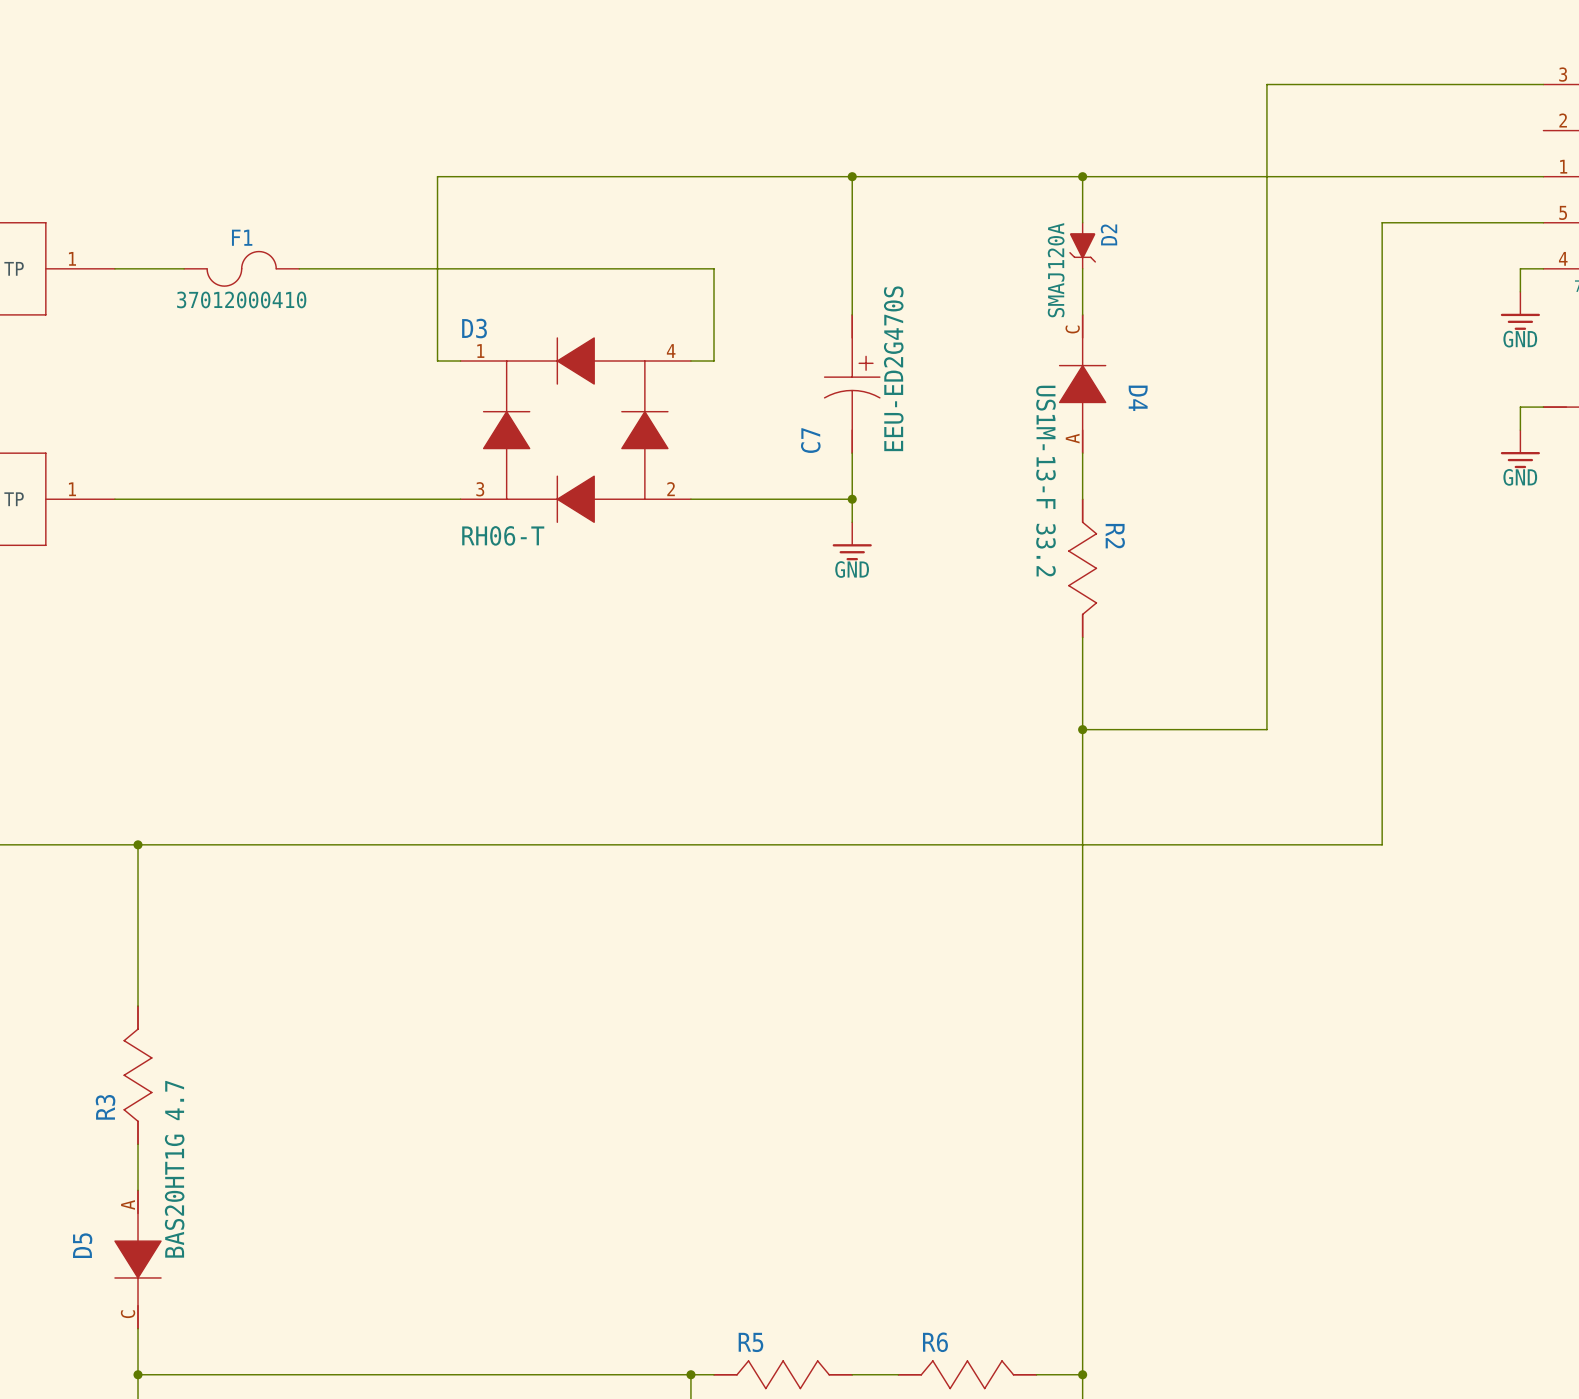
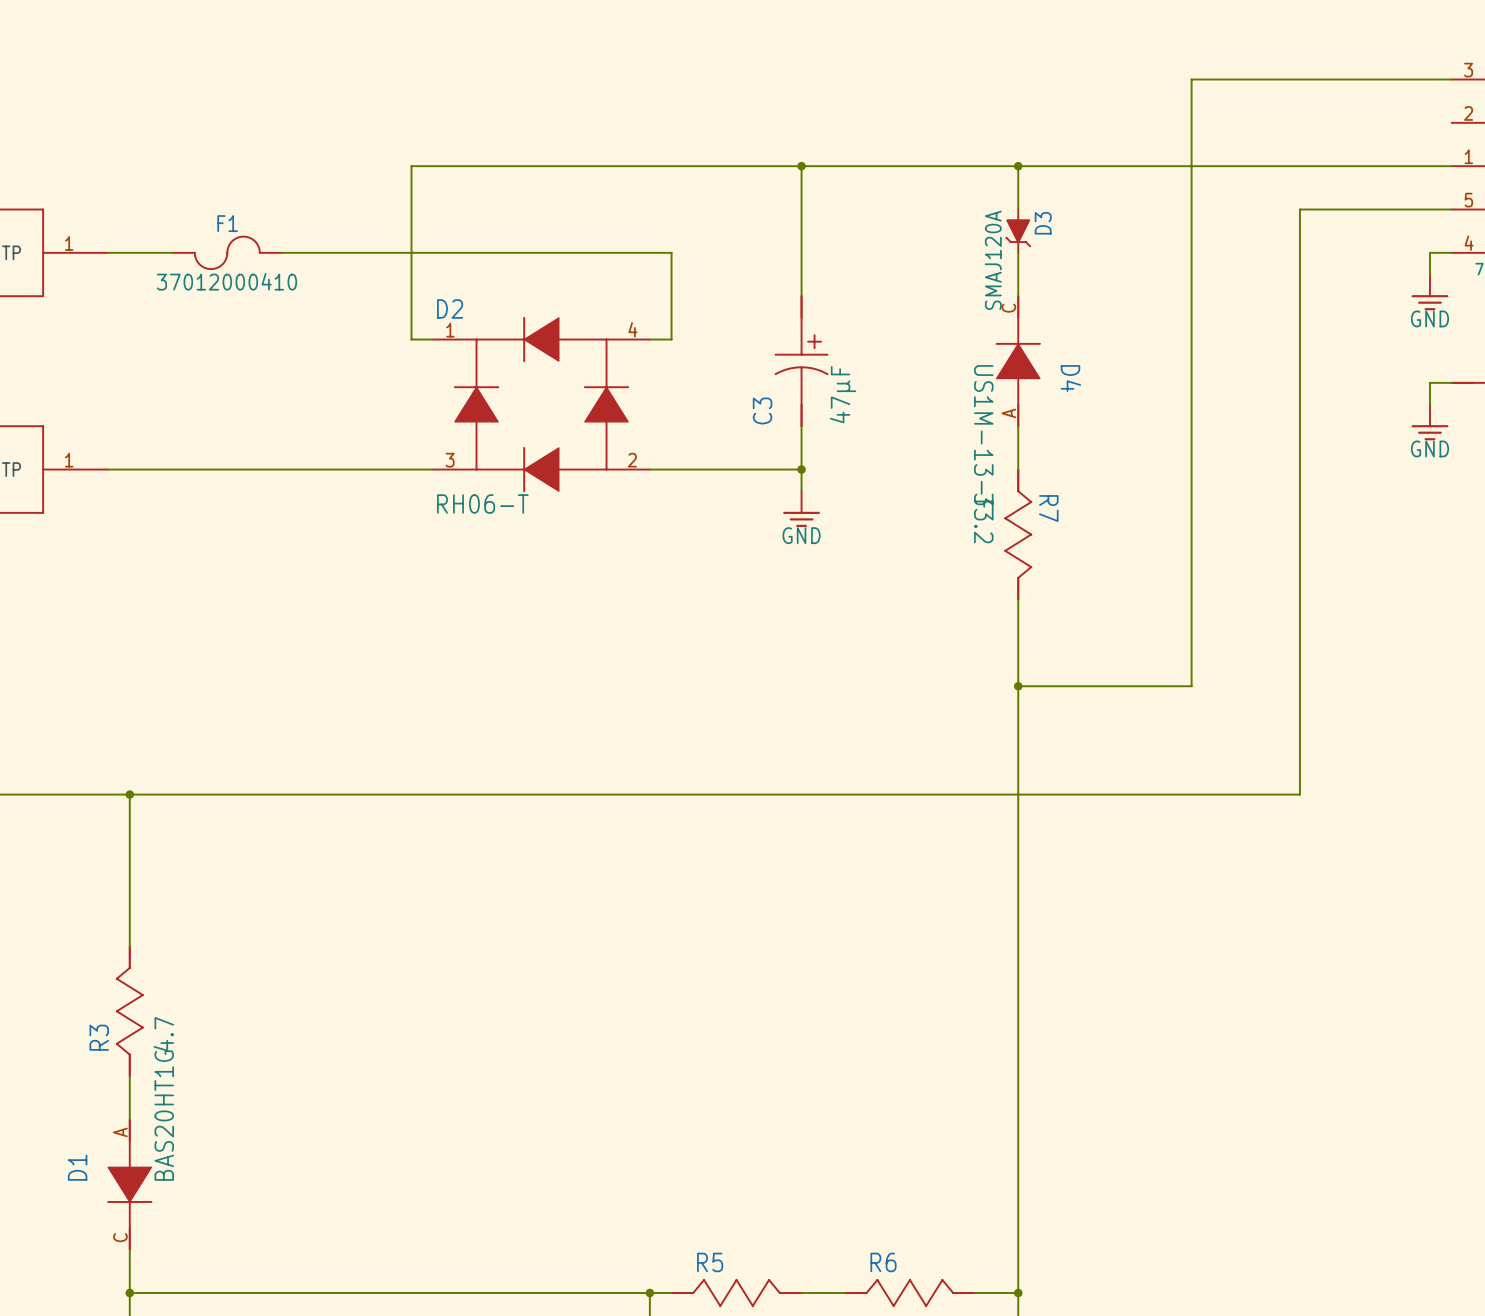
D2 name: D2 (1108, 234) -> D3 (1043, 223)
D3 name: D3 (474, 328) -> D2 (450, 308)
C7 value: EEU-ED2G470S (893, 368) -> 47µF (843, 394)
C7 name: C7 (810, 440) -> C3 (762, 410)
R2 name: R2 (1115, 536) -> R7 (1048, 508)
D5 name: D5 (82, 1245) -> D1 (77, 1167)

